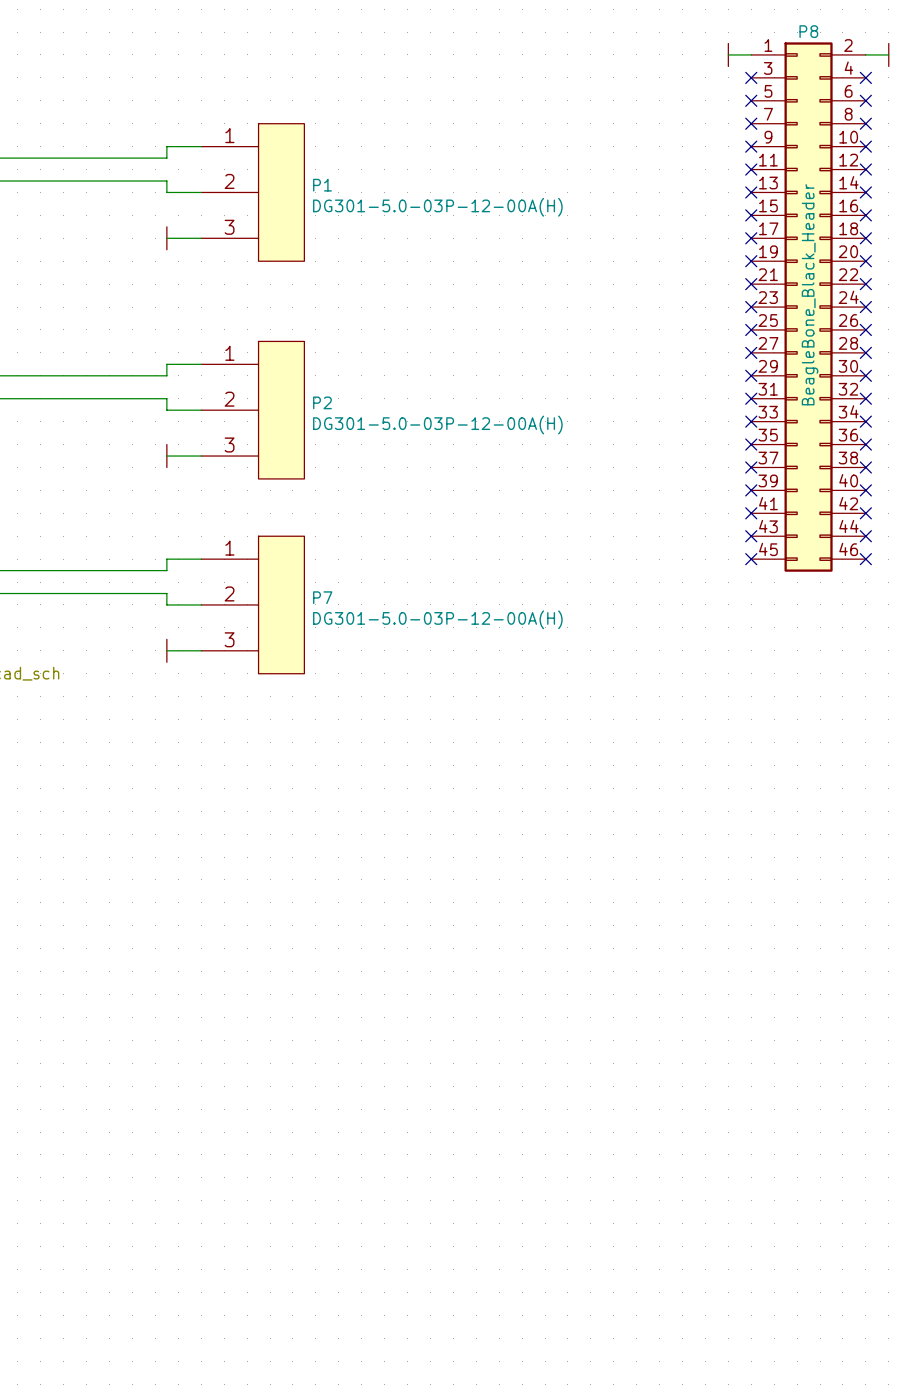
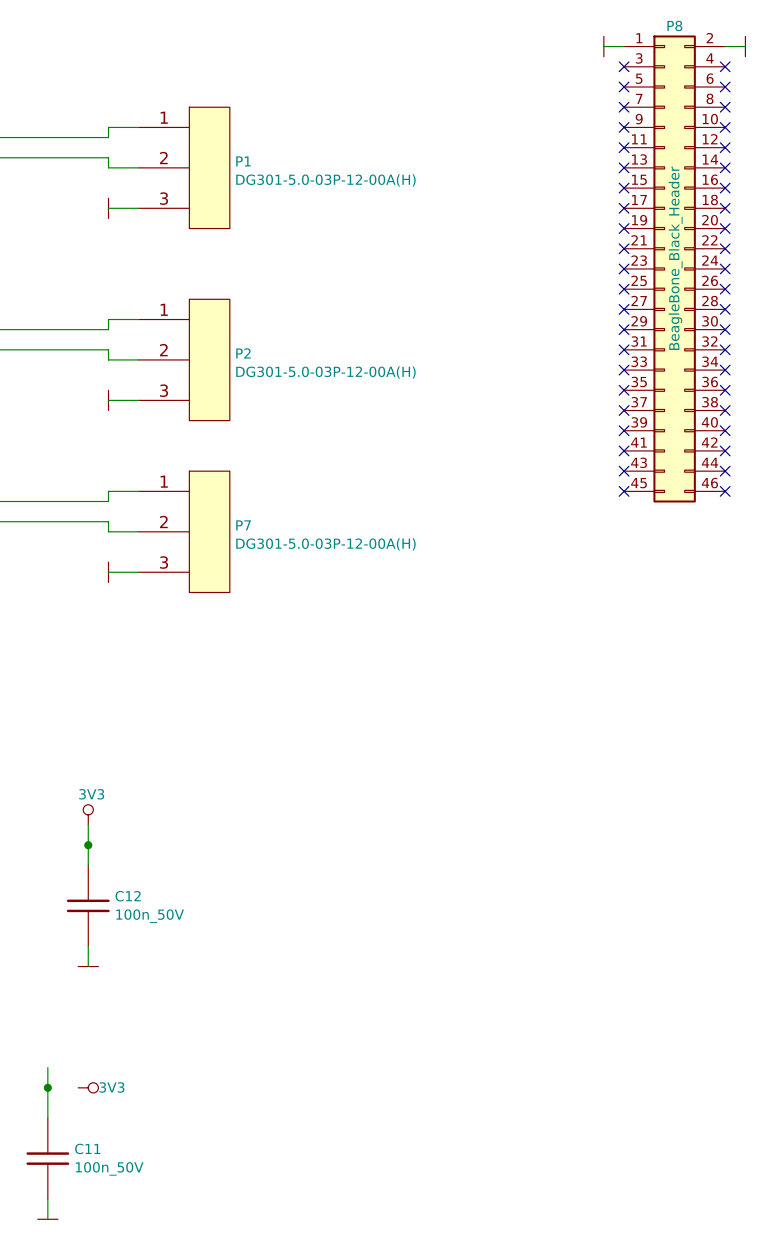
power symbol: none -> 3V3 (88, 814)
wire: none -> (88, 825) (88, 865)
junction: none -> (88, 845)
C12: none -> 100n_50V (88, 905)
wire: none -> (88, 946) (88, 966)
power symbol: none -> (88, 966)
wire: none -> (47, 1067) (47, 1118)
junction: none -> (47, 1087)
power symbol: none -> 3V3 (88, 1087)
C11: none -> 100n_50V (47, 1158)
wire: none -> (47, 1199) (47, 1219)
power symbol: none -> (47, 1219)

